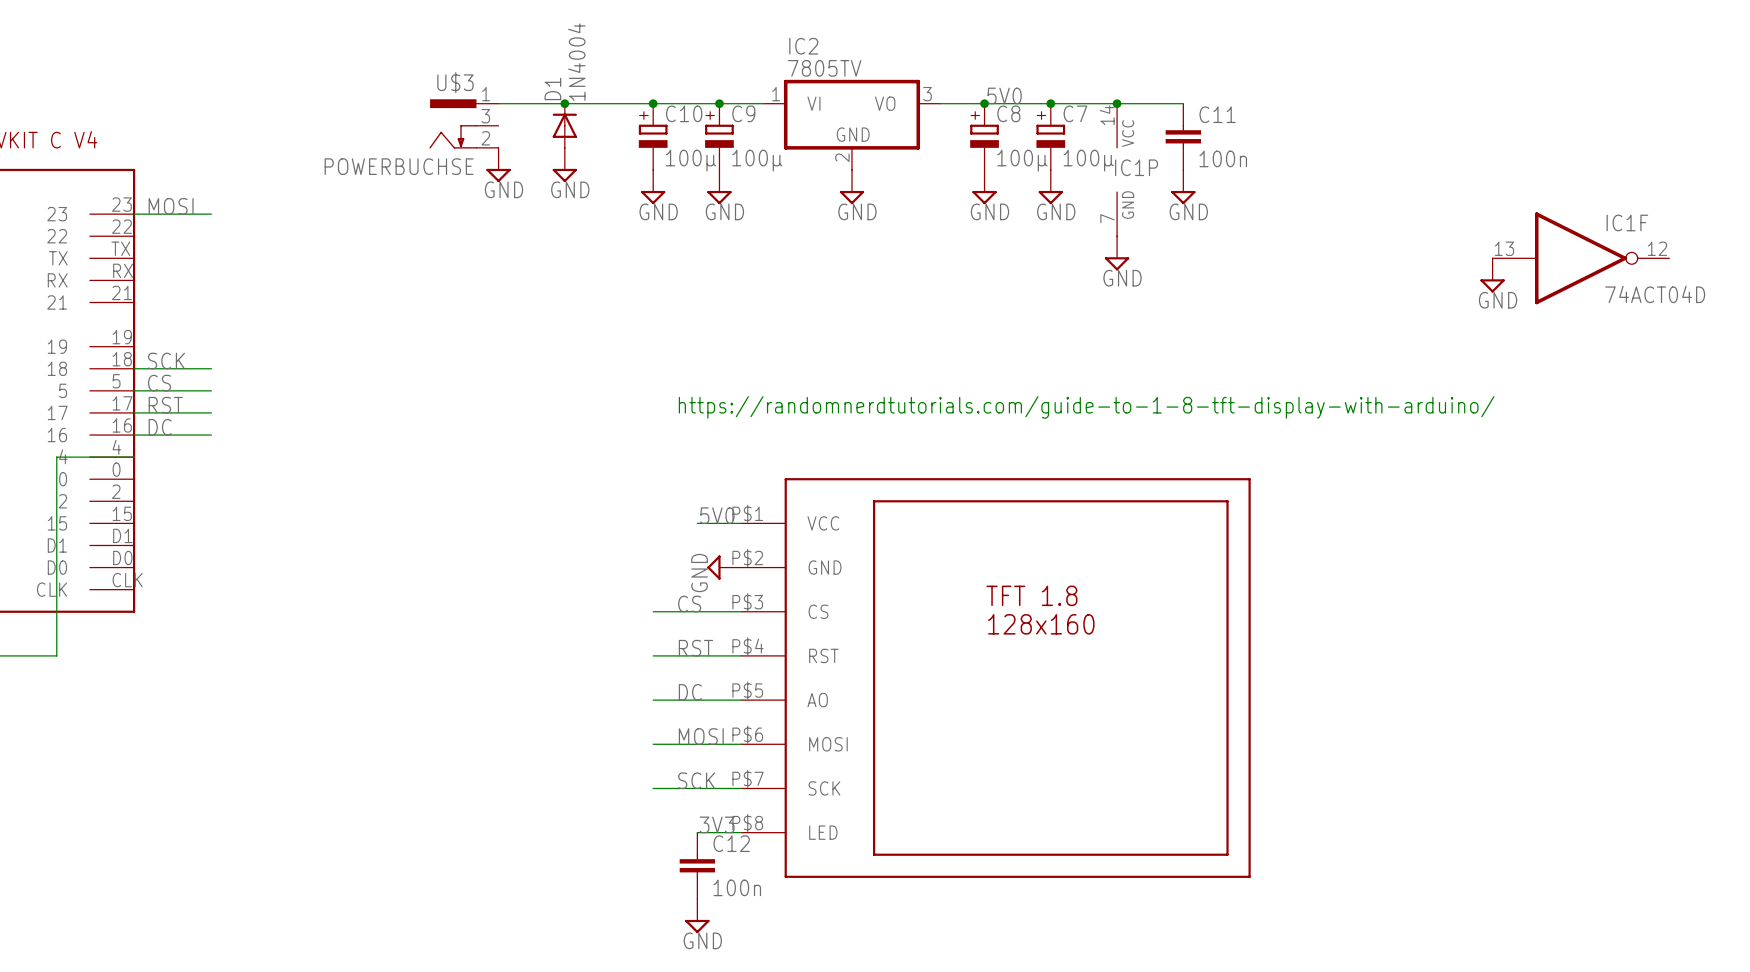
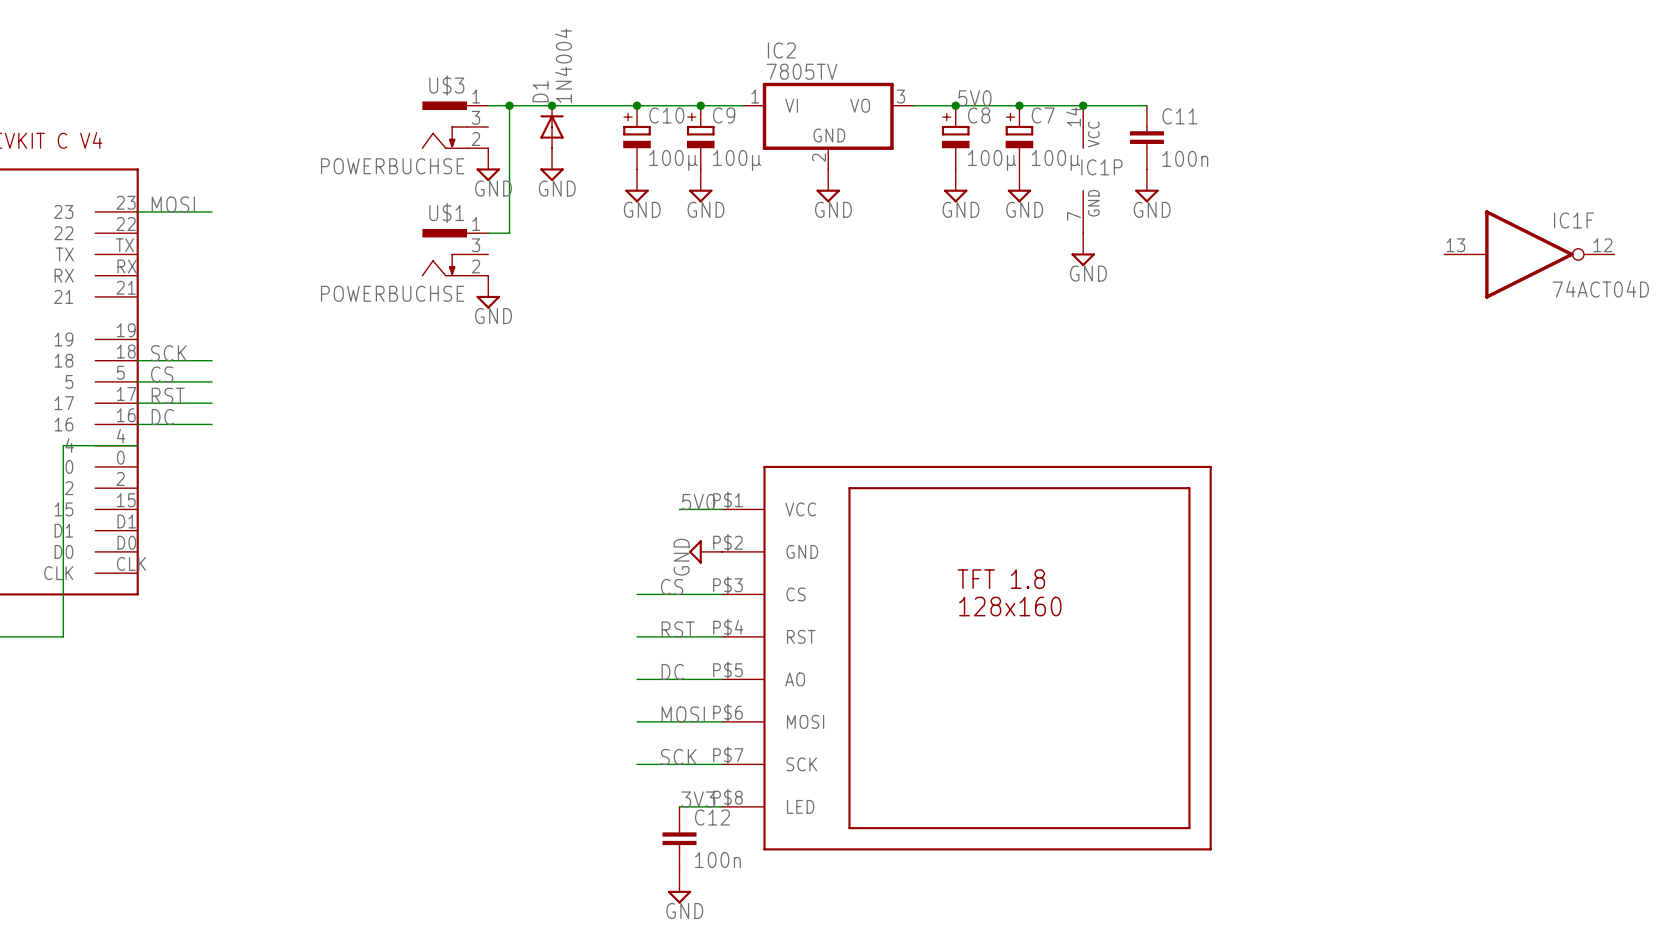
wire: none -> (509, 105) (509, 233) (488, 233)
junction: none -> (509, 105)
U$1: none -> POWERBUCHSE (455, 252)
power symbol: GND (1492, 275) -> none
power symbol: none -> GND (488, 292)
text: https://randomnerdtutorials.com/guide-to-1-8-tft-display-with-arduino/ (1086, 407) -> none

